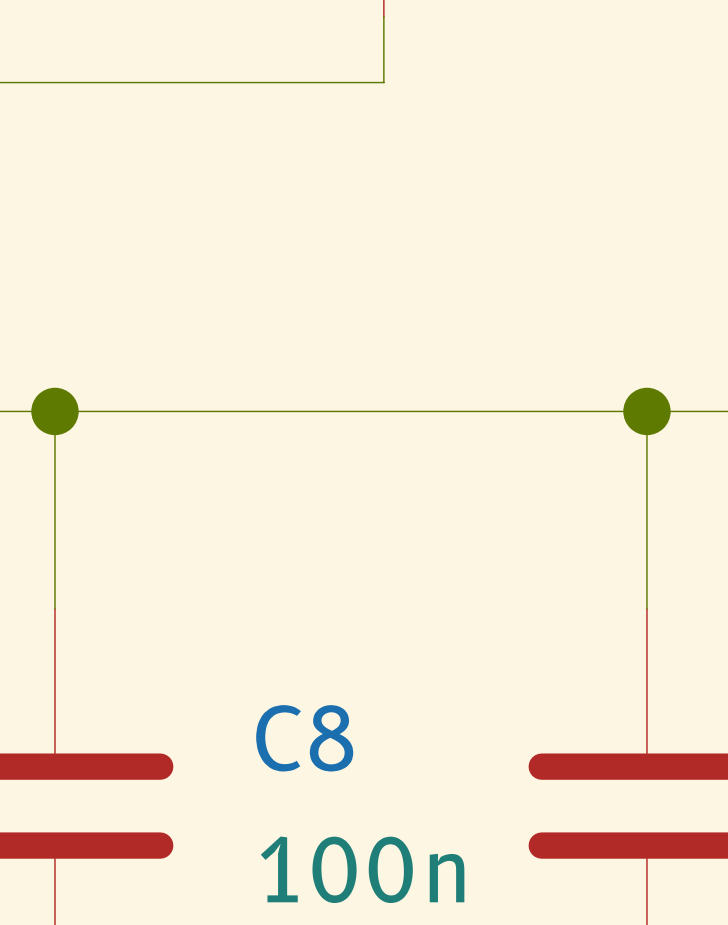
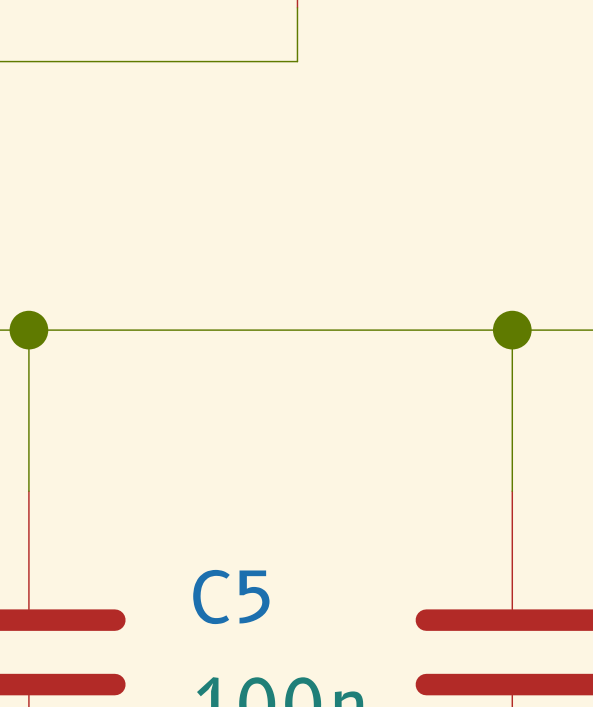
C8 name: C8 (304, 738) -> C5 (231, 596)

